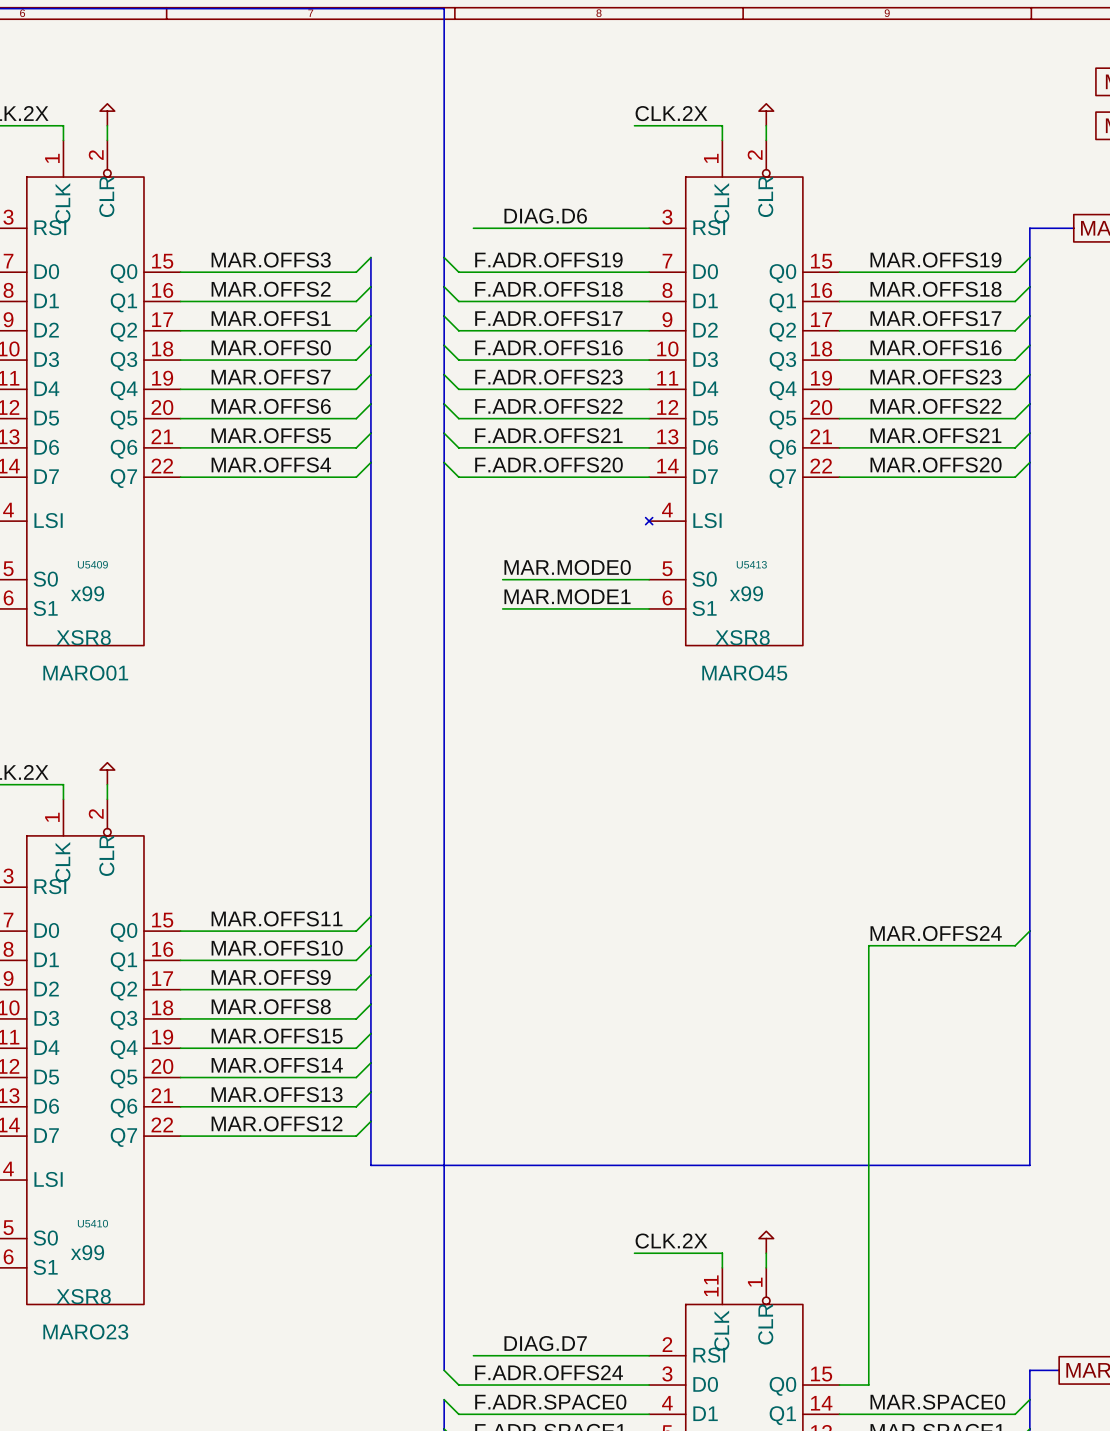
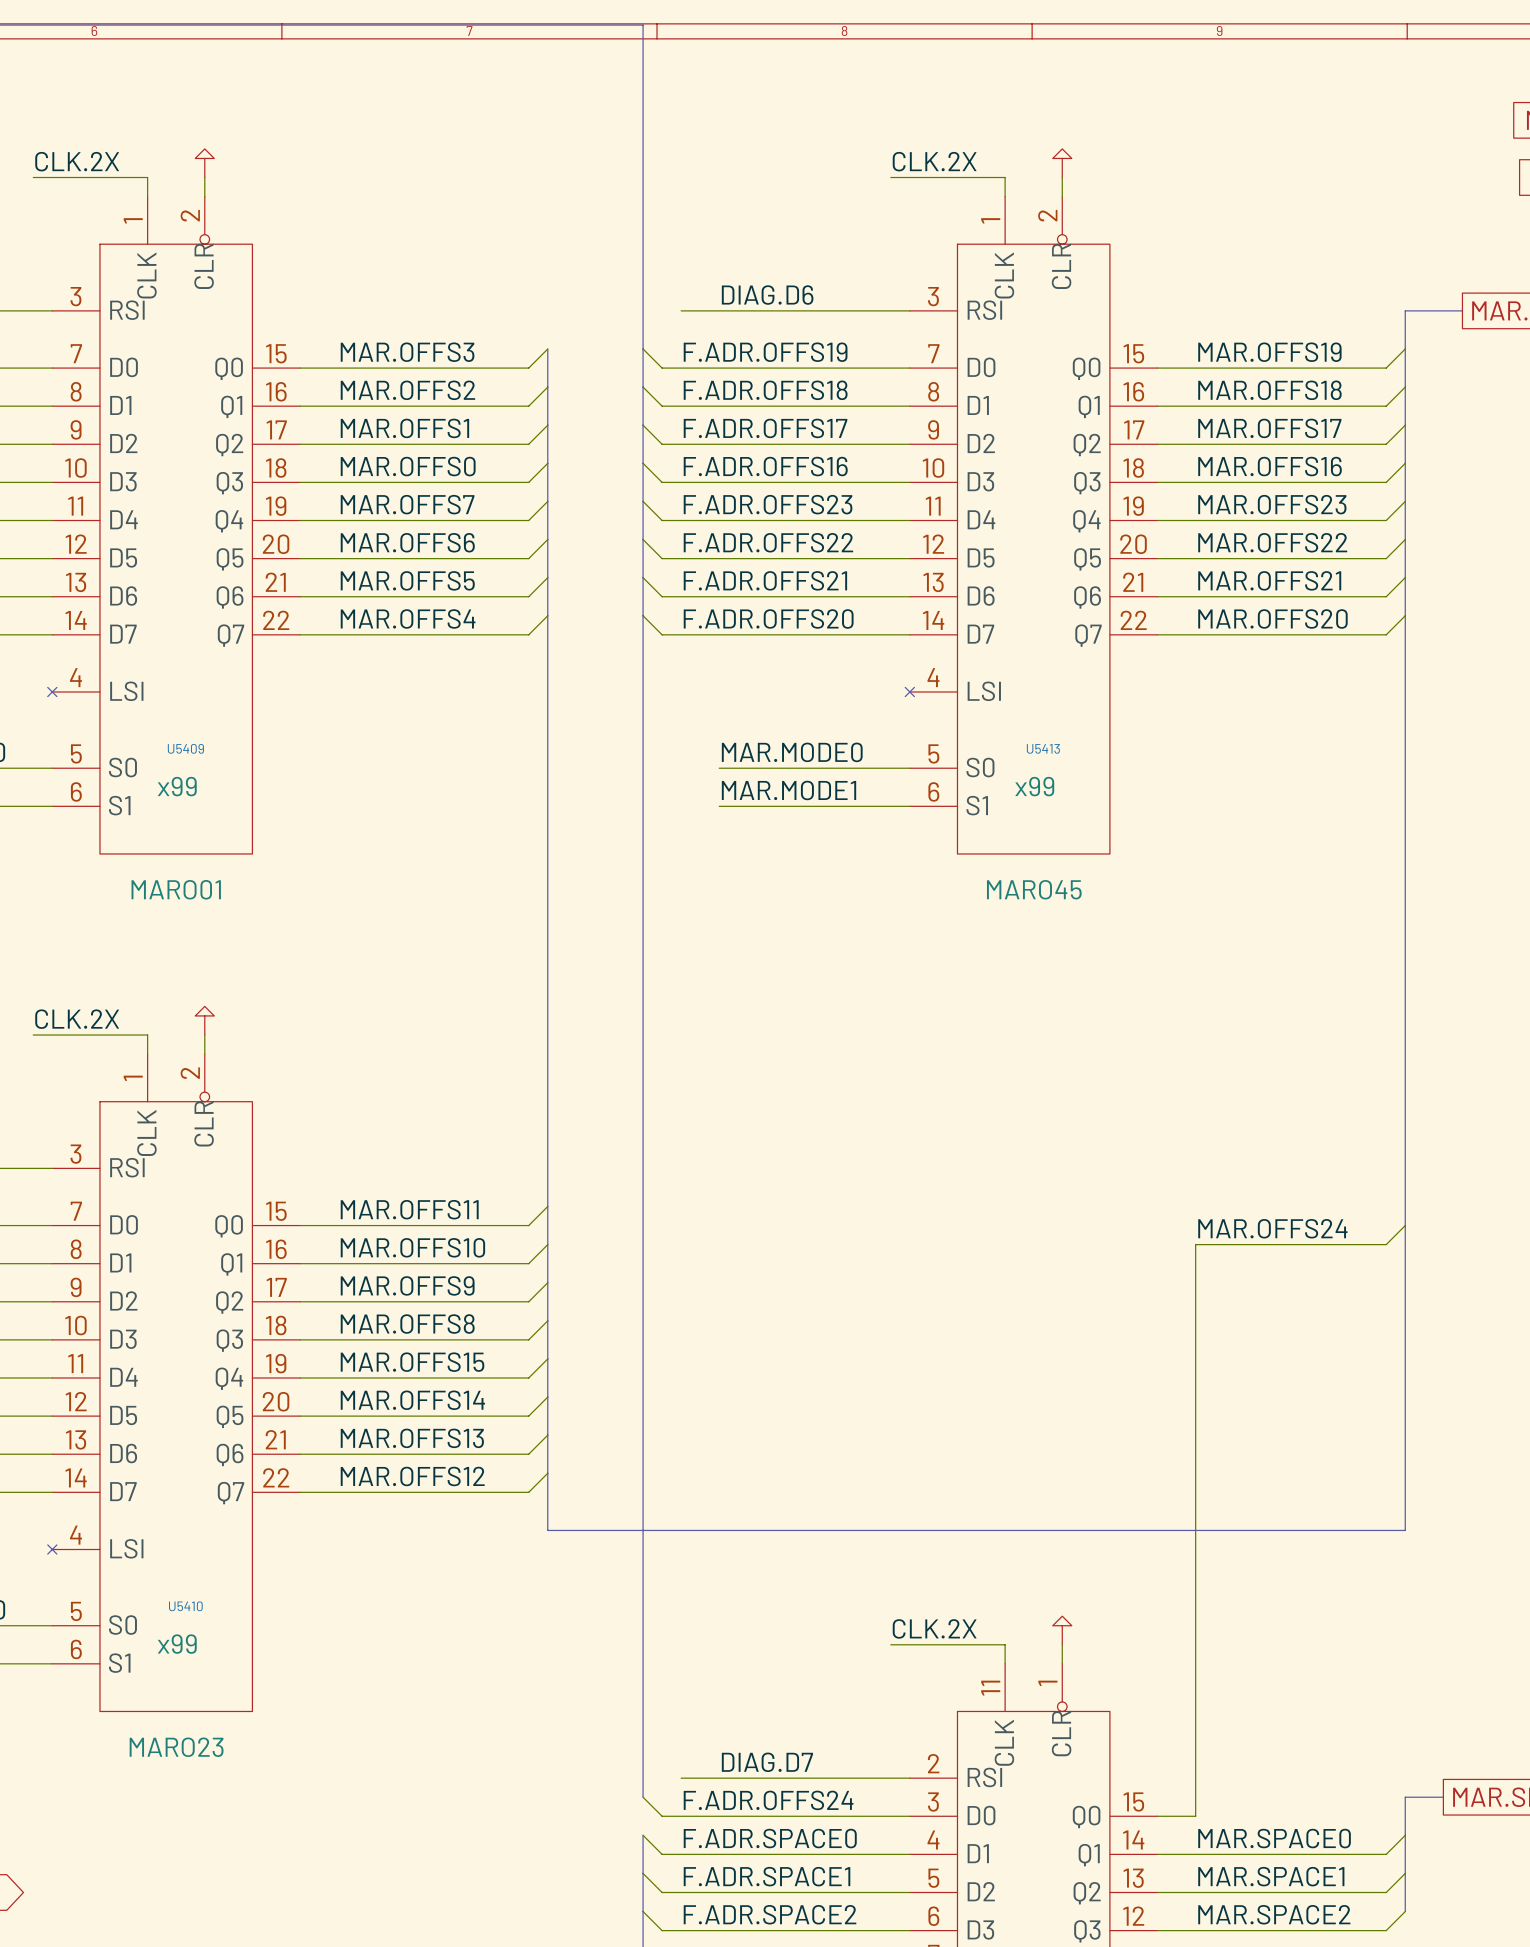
U5409 value: XSR8 (83, 637) -> none
U5413 value: XSR8 (742, 637) -> none
U5410 value: XSR8 (83, 1296) -> none

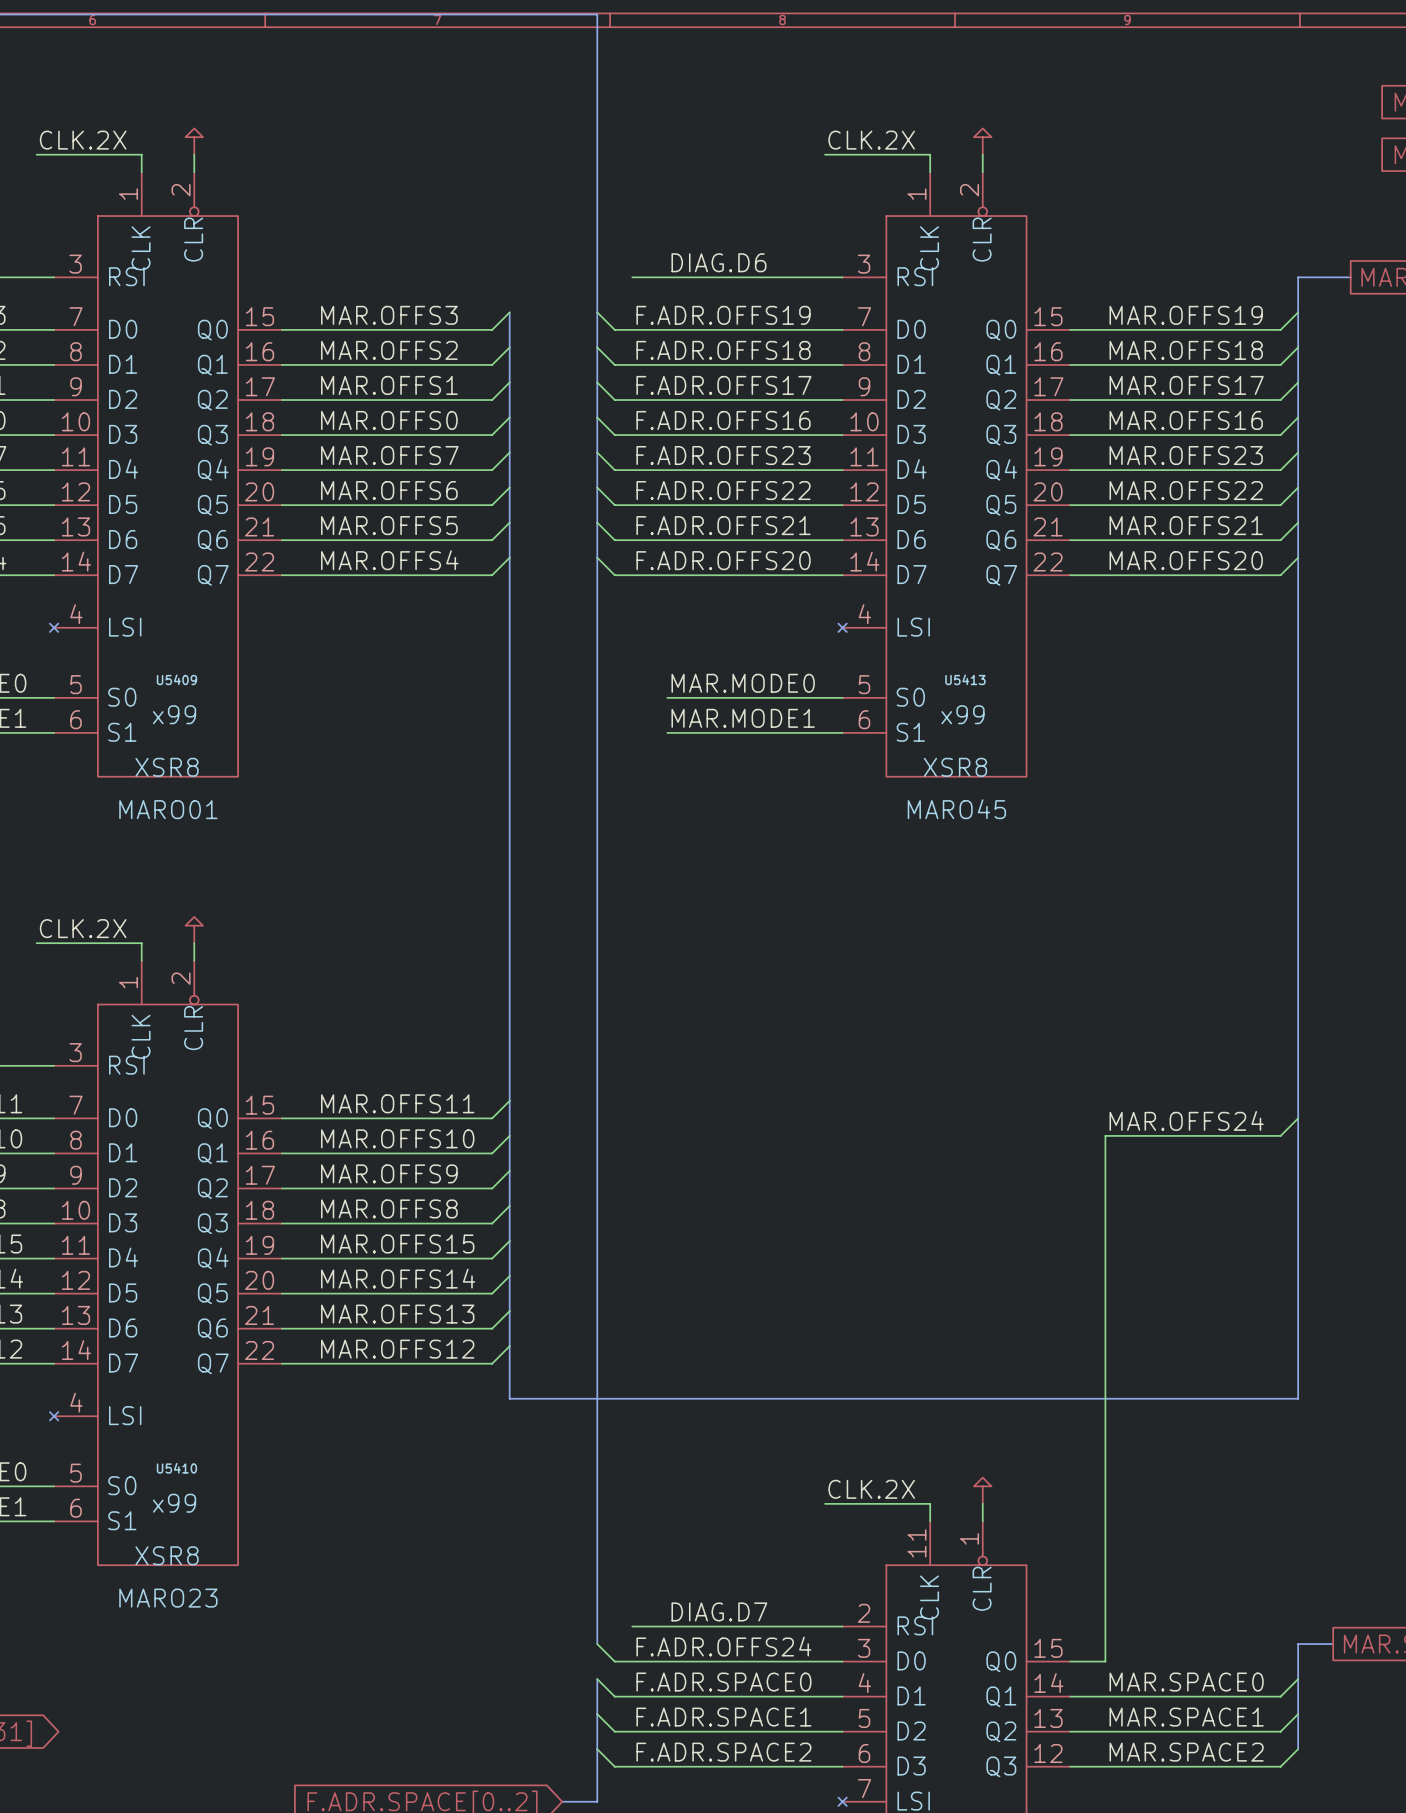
U5409 value: none -> XSR8 (167, 767)
U5413 value: none -> XSR8 (955, 767)
U5410 value: none -> XSR8 (167, 1555)

